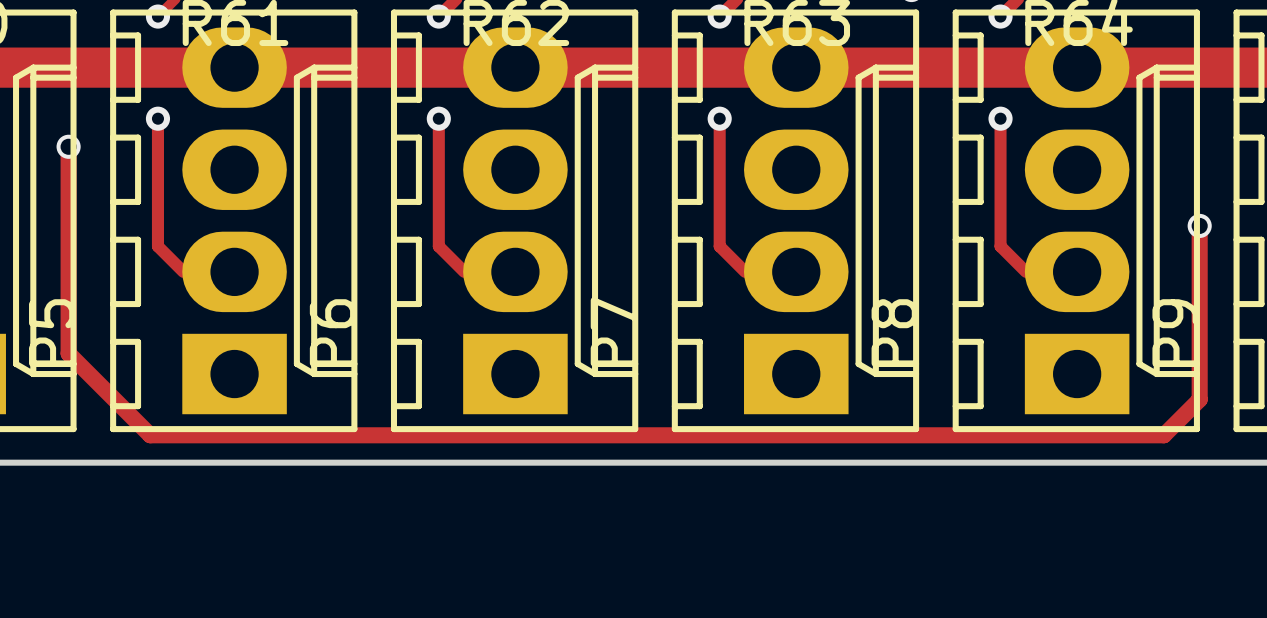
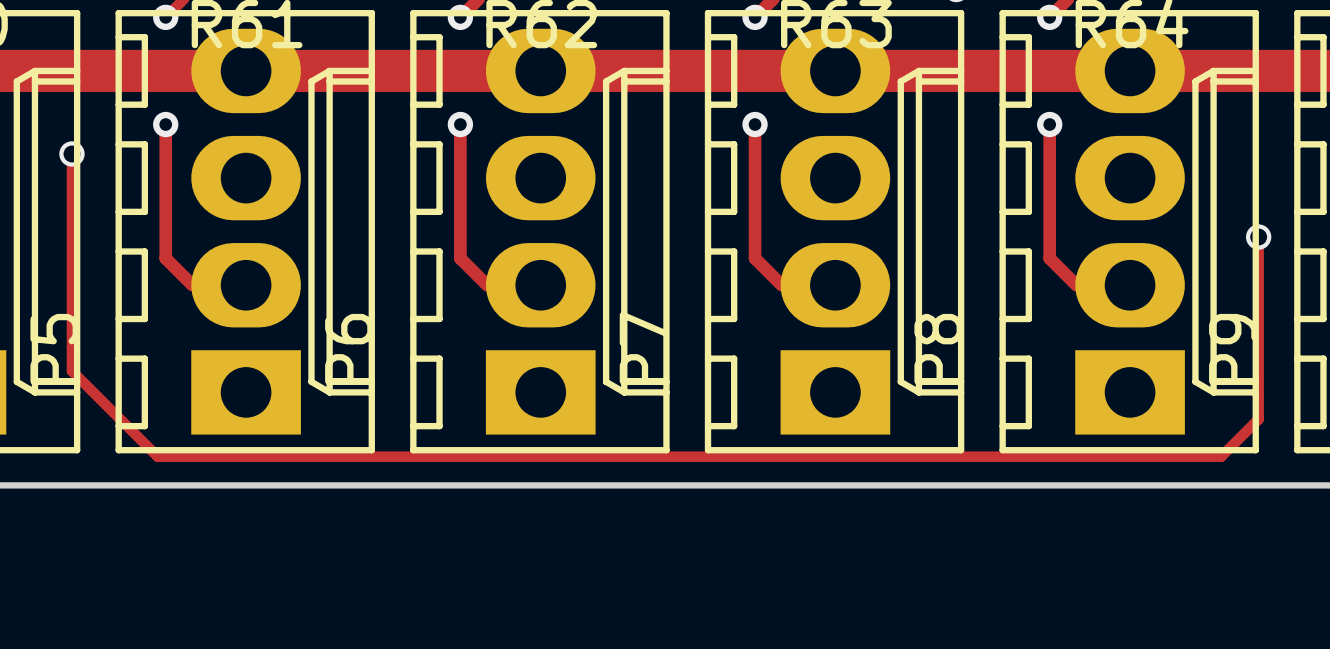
track width: thick (68, 146) (68, 353) (150, 435) (1163, 435) (1199, 399) (1199, 225) -> thin (71, 153) (71, 370) (157, 456) (1221, 456) (1258, 419) (1258, 237)

